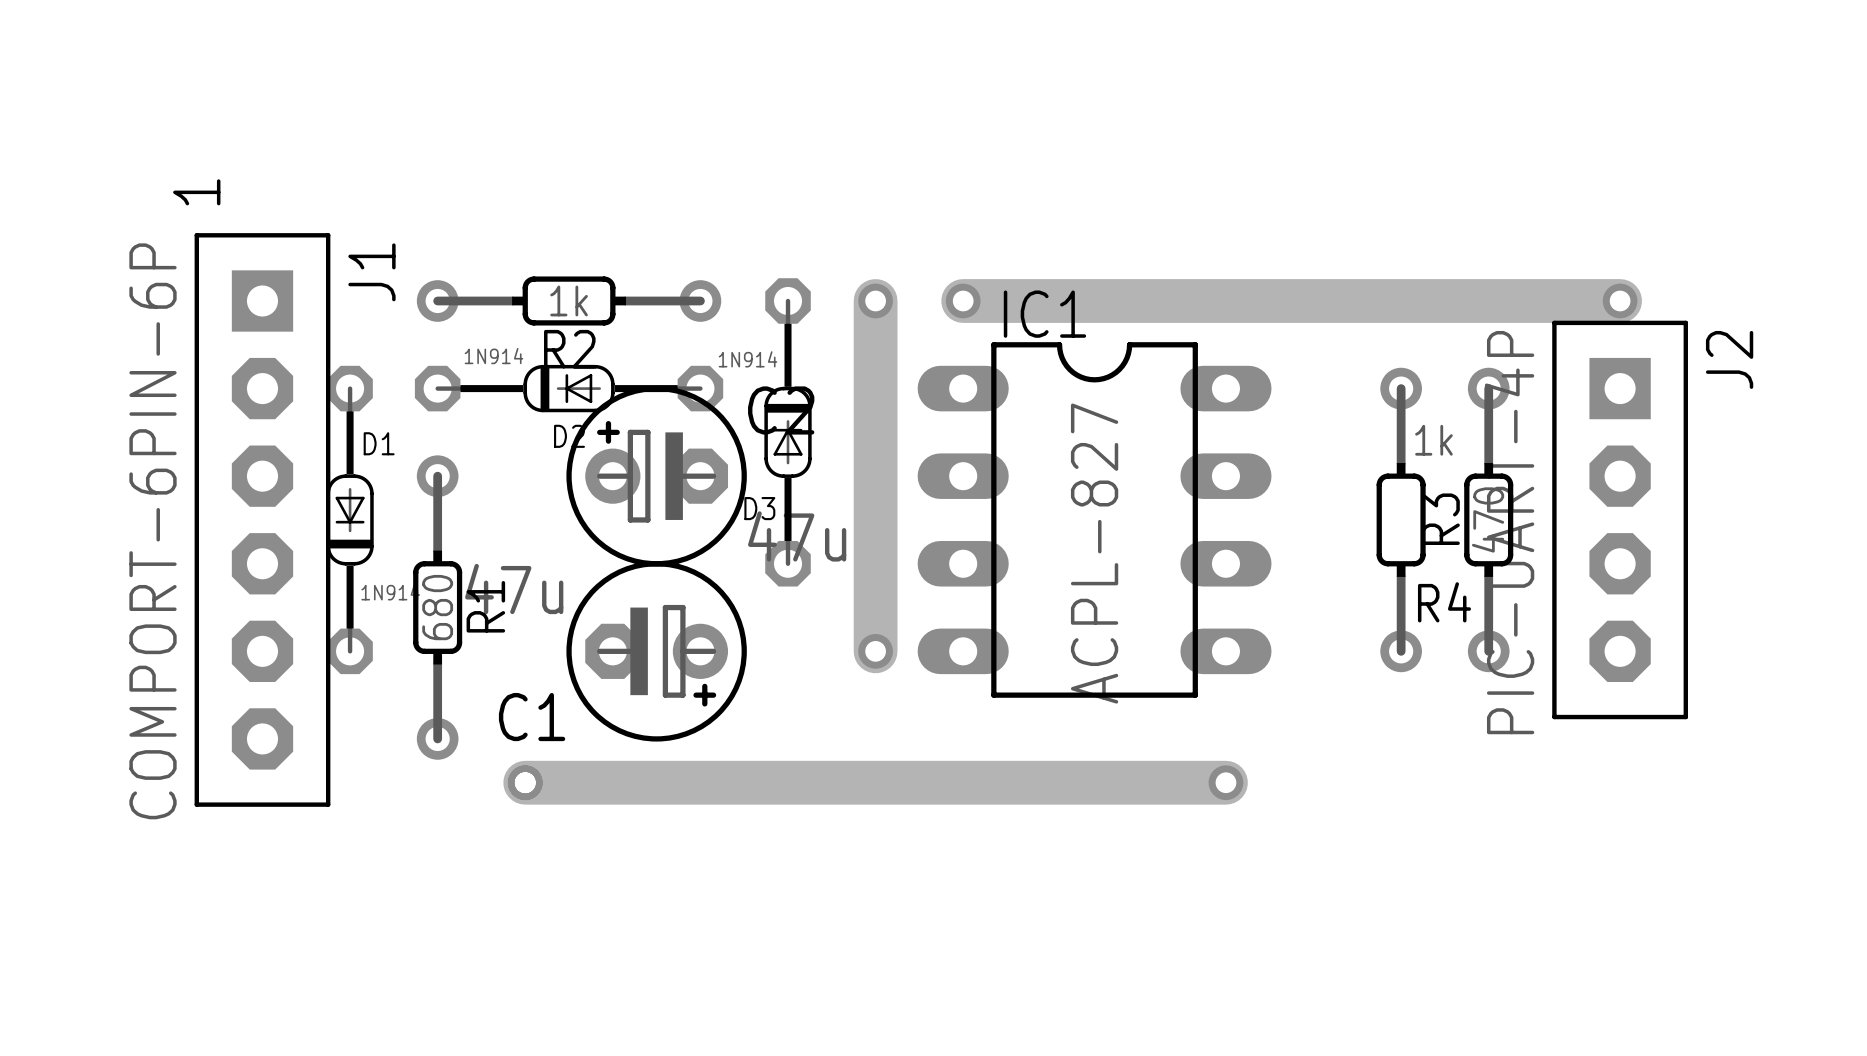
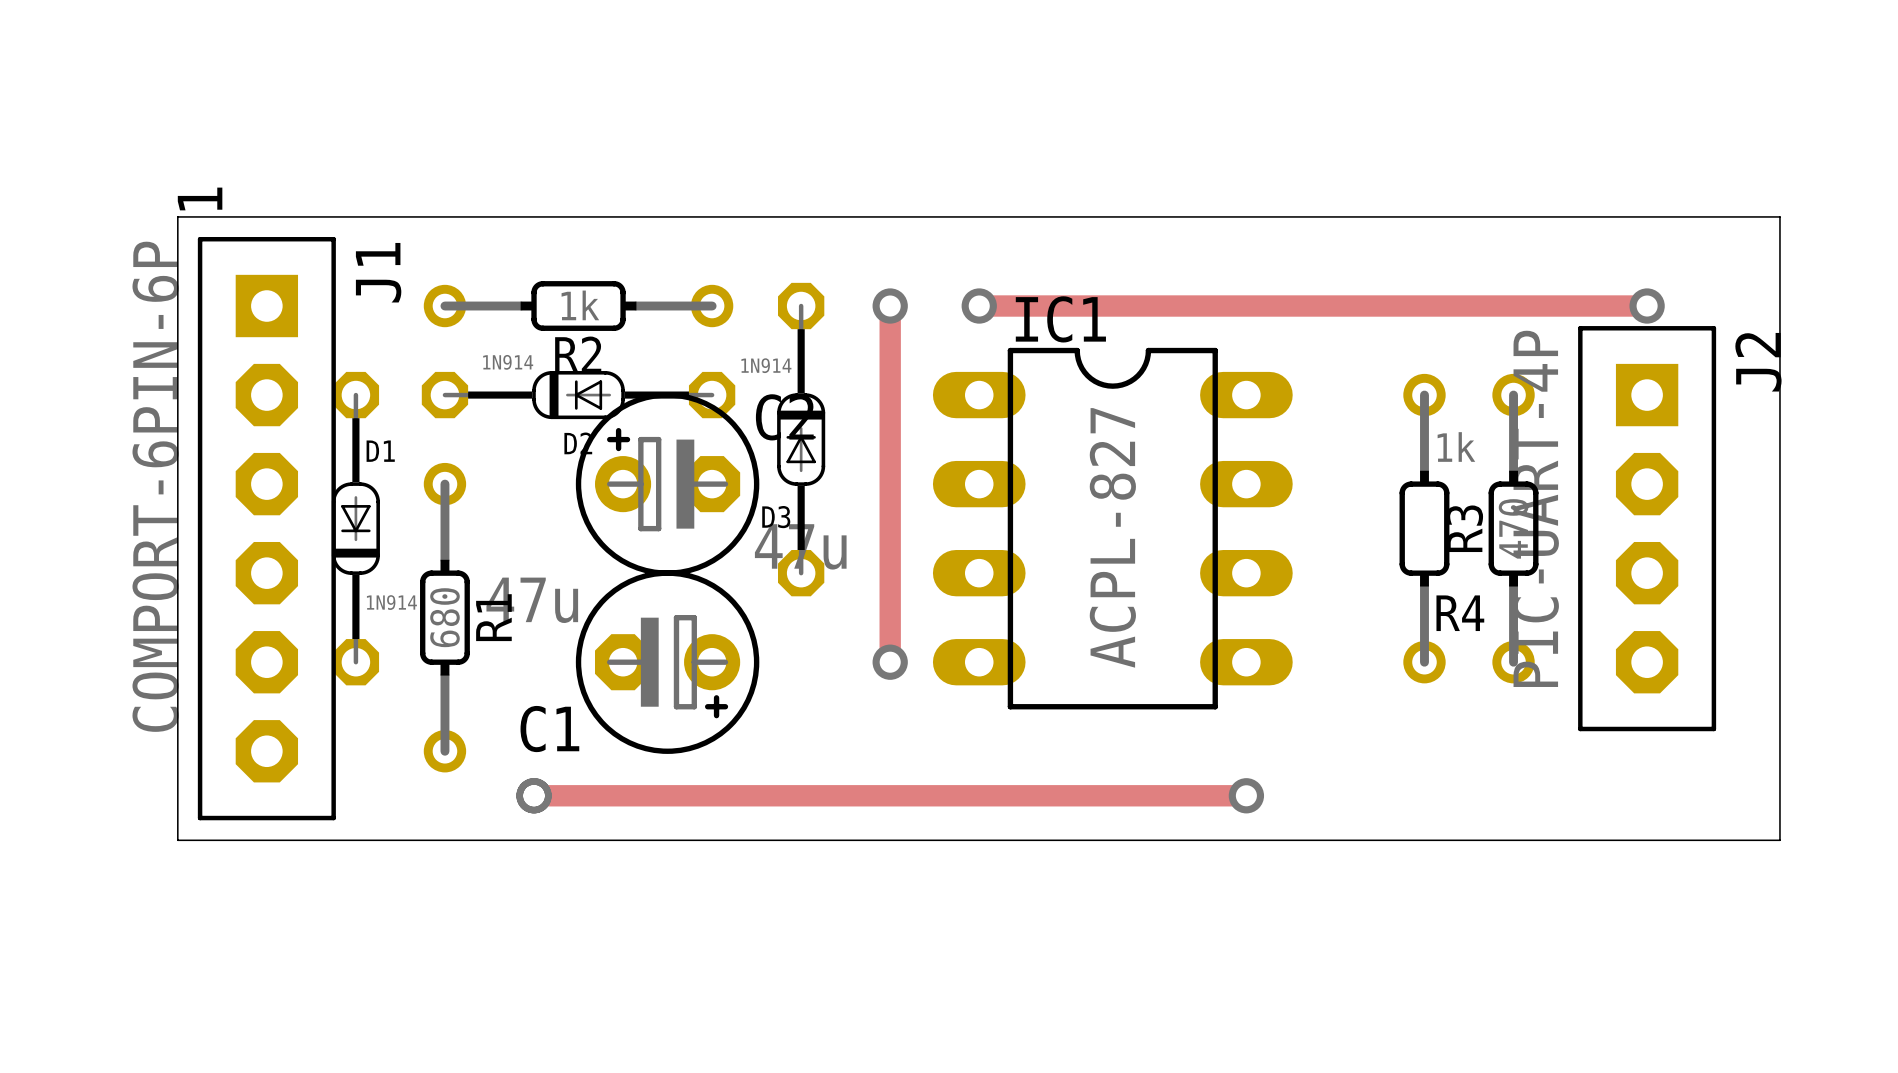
board edge: none -> (177, 216) (1779, 216) (1779, 840) (177, 840) (177, 216)
track width: thick (875, 300) (875, 651) -> thin (890, 306) (890, 662)
track width: thick (963, 300) (1620, 300) -> thin (979, 306) (1647, 306)
track width: thick (525, 782) (1225, 782) -> thin (534, 795) (1246, 795)

